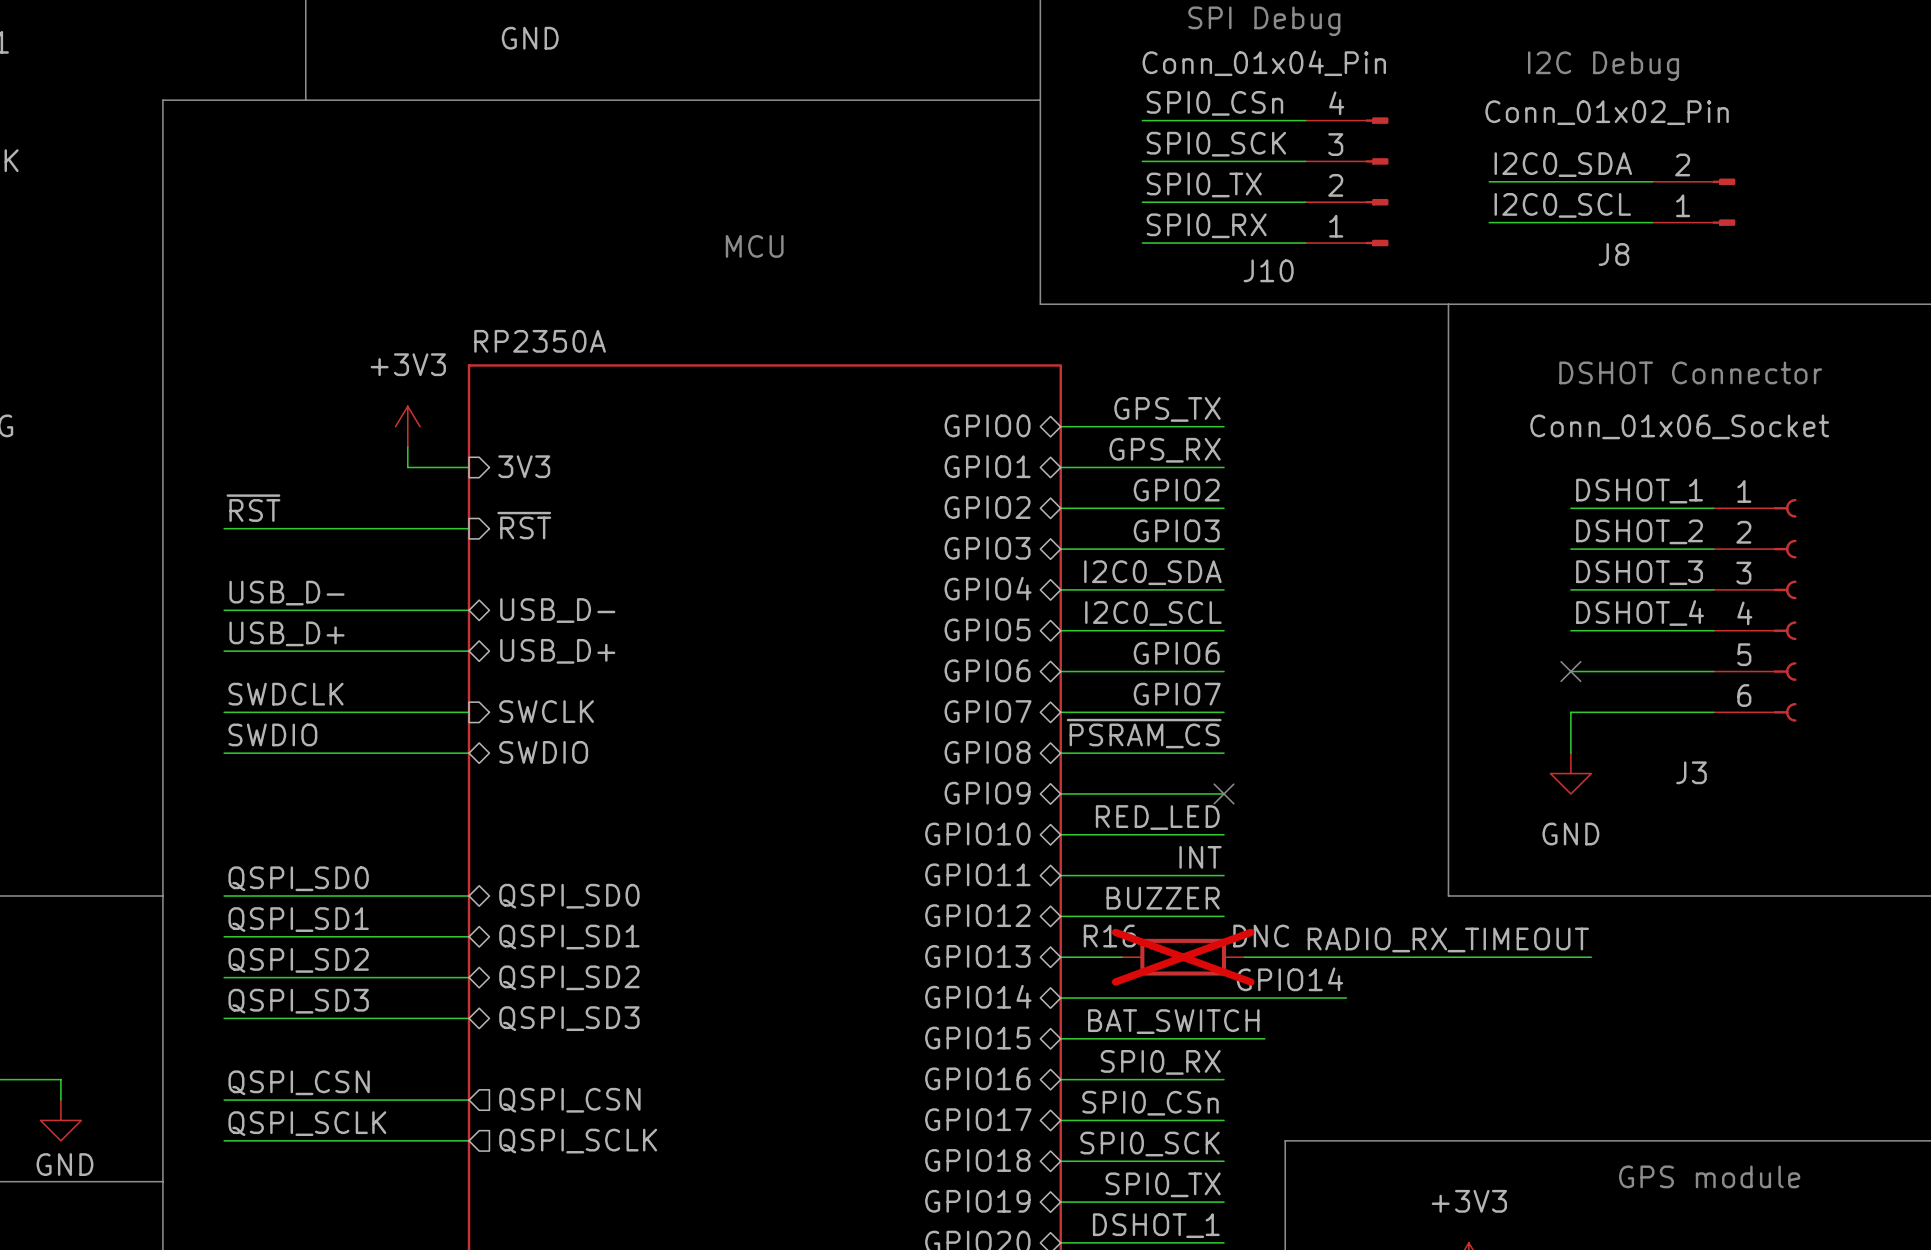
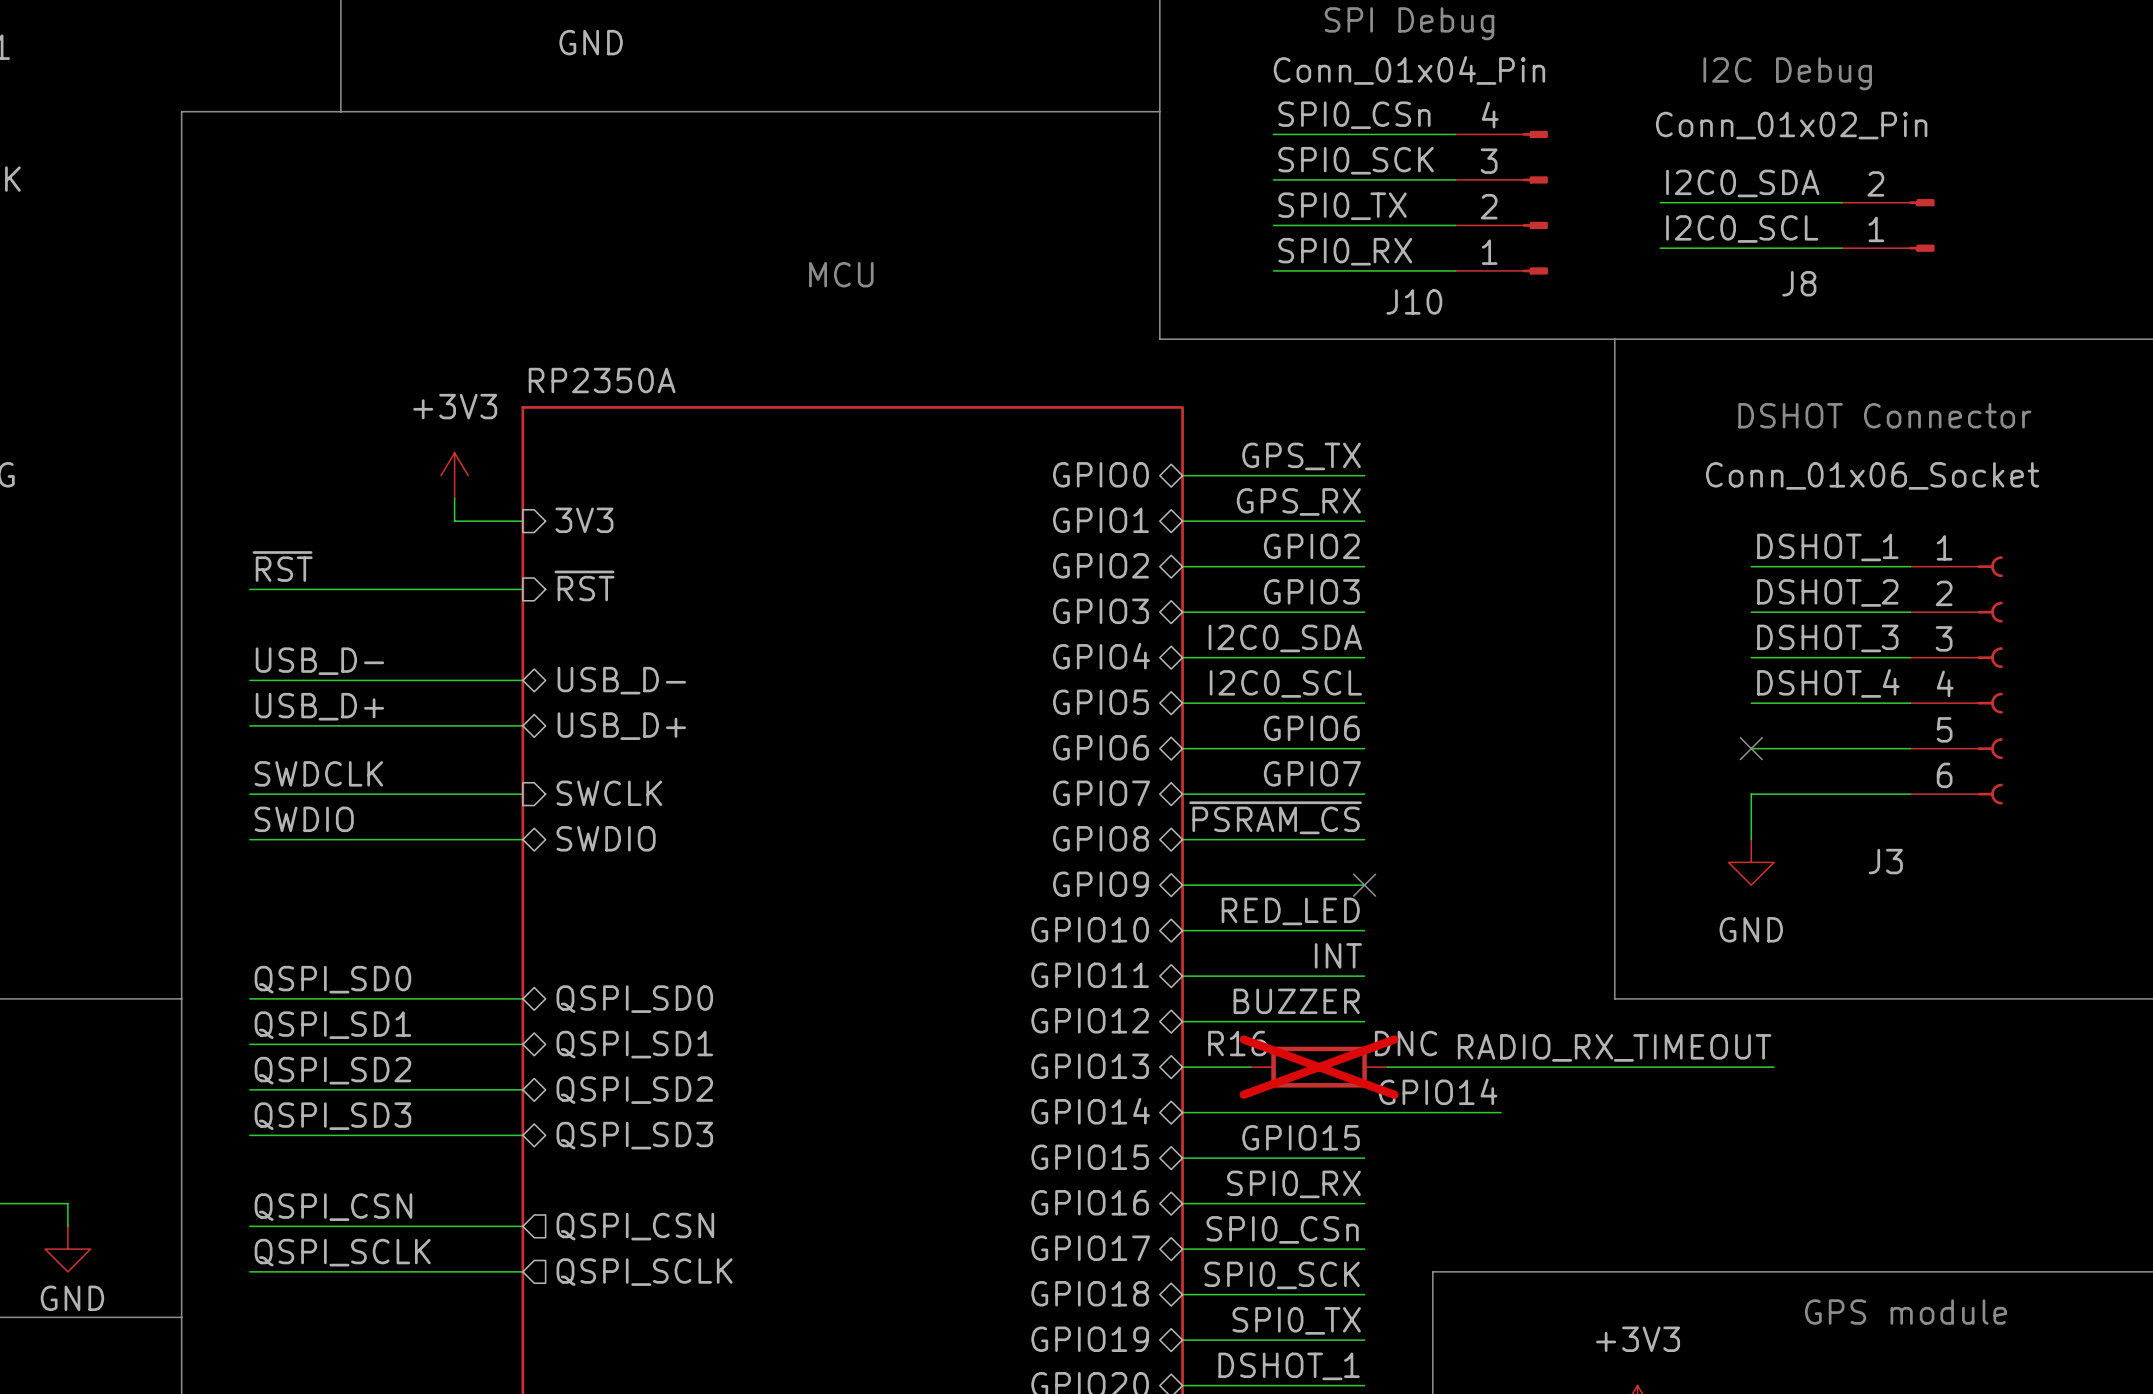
label: none -> GPIO15 (1301, 1137)
label: BAT_SWITCH (1173, 1021) -> none
wire: (1224, 1038) (1264, 1038) -> none

